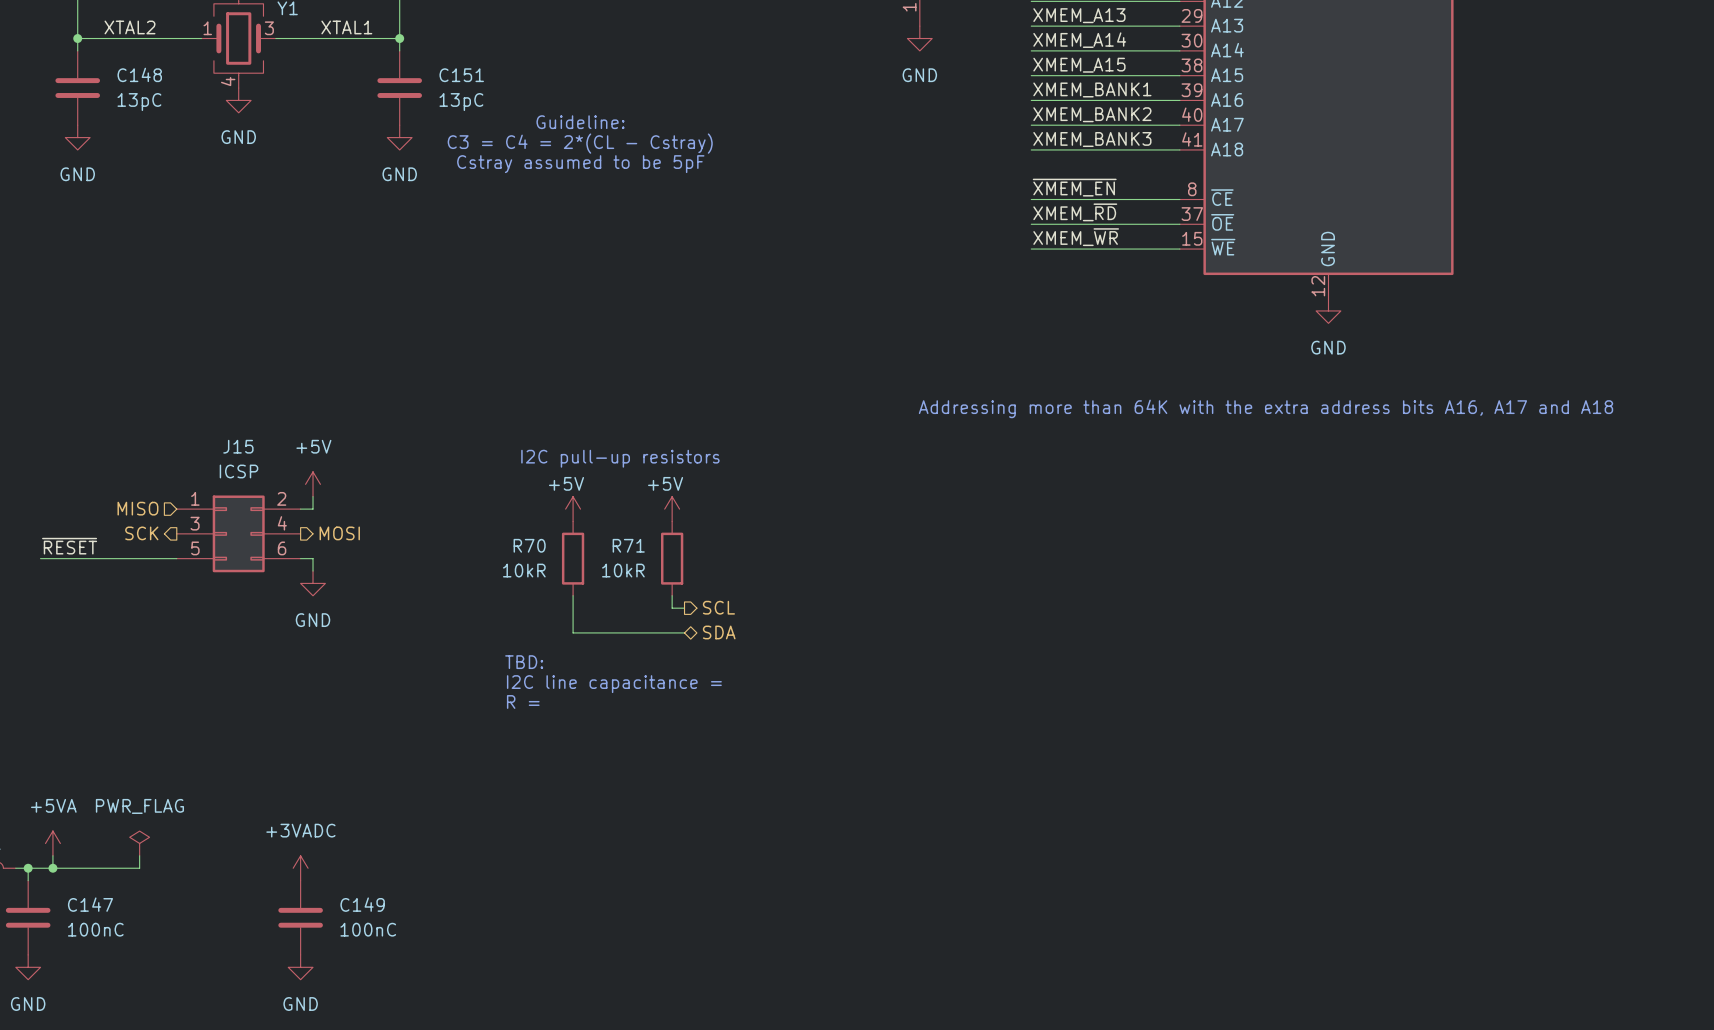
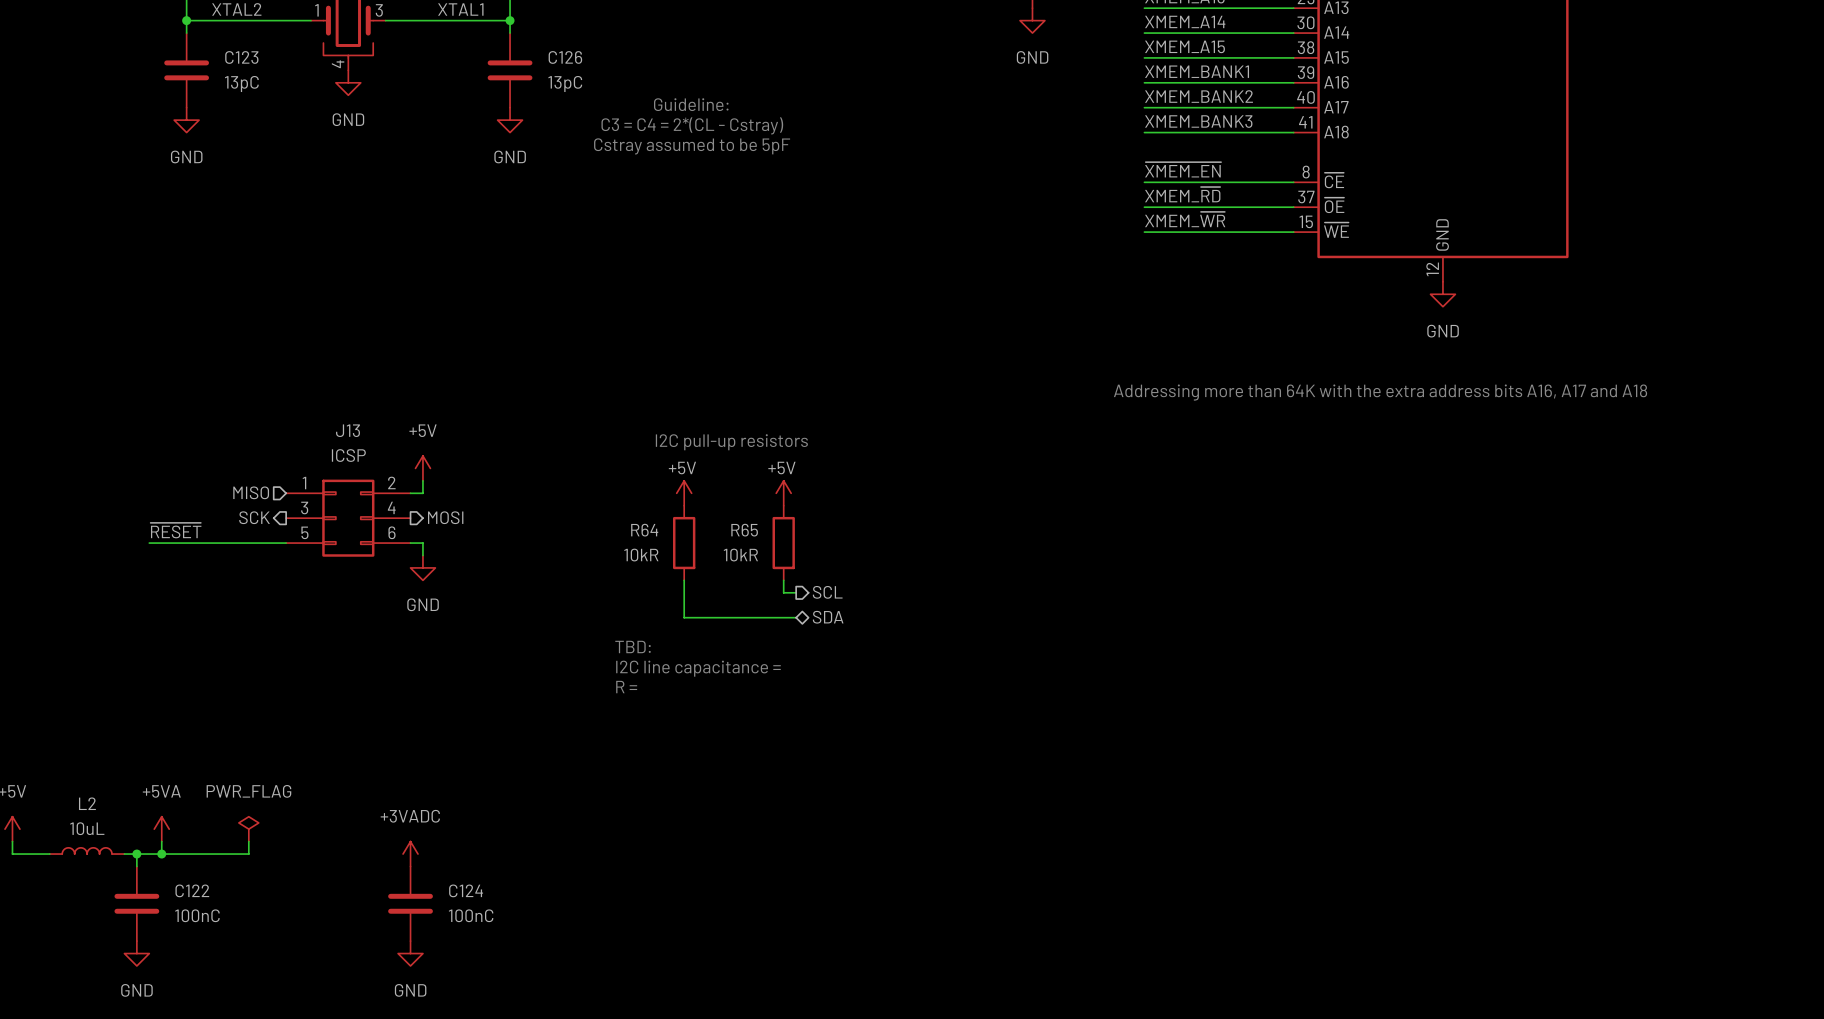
C148 name: C148 (139, 74) -> C123 (241, 57)
C151 name: C151 (461, 75) -> C126 (565, 57)
J15 name: J15 (238, 446) -> J13 (348, 430)
R70 name: R70 (529, 545) -> R64 (644, 530)
R71 name: R71 (628, 545) -> R65 (744, 530)
C147 name: C147 (90, 904) -> C122 (192, 890)
C149 name: C149 (362, 904) -> C124 (466, 890)

